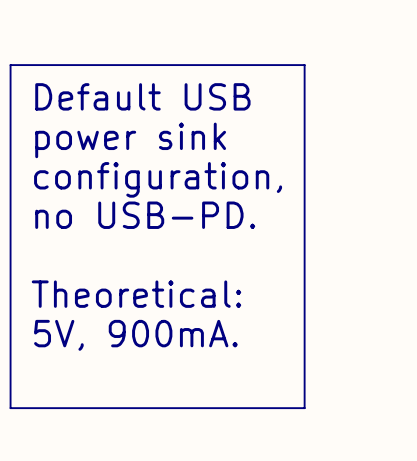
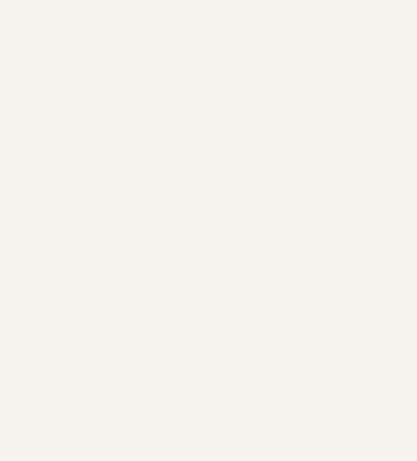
line: (10, 65) (304, 65) (304, 408) (10, 408) (10, 65) -> none
text: Default USB (142, 96) -> none
text: power sink (130, 140) -> none
text: configuration, (158, 179) -> none
text: no USB-PD. (145, 215) -> none
text: Theoretical: (136, 294) -> none
text: 5V, 900mA. (135, 335) -> none

